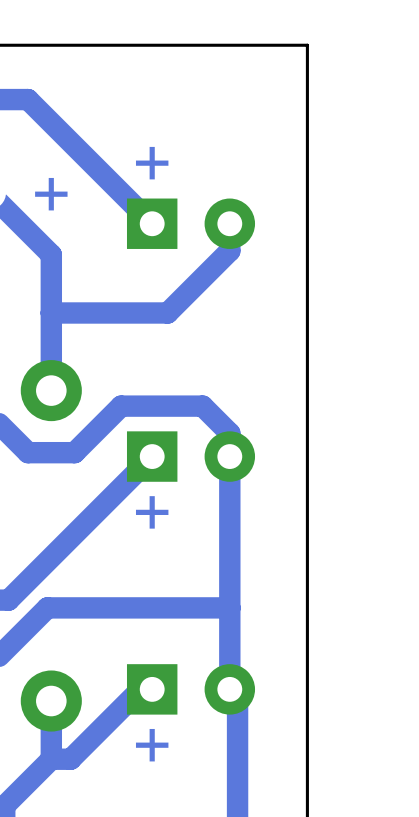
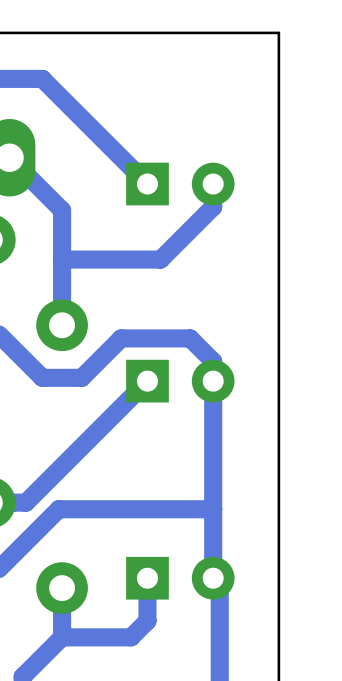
text: + (152, 163) -> none
text: + (51, 194) -> none
text: + (152, 512) -> none
track: (152, 689) (140, 689) (70, 759) -> (147, 578) (147, 620) (131, 637) (78, 637)
text: + (152, 745) -> none

